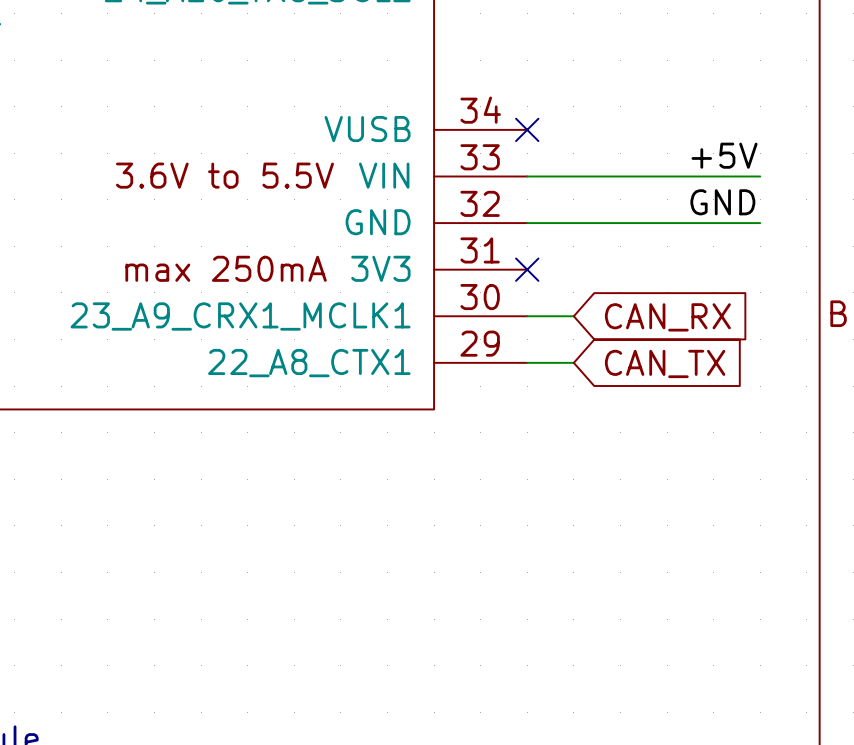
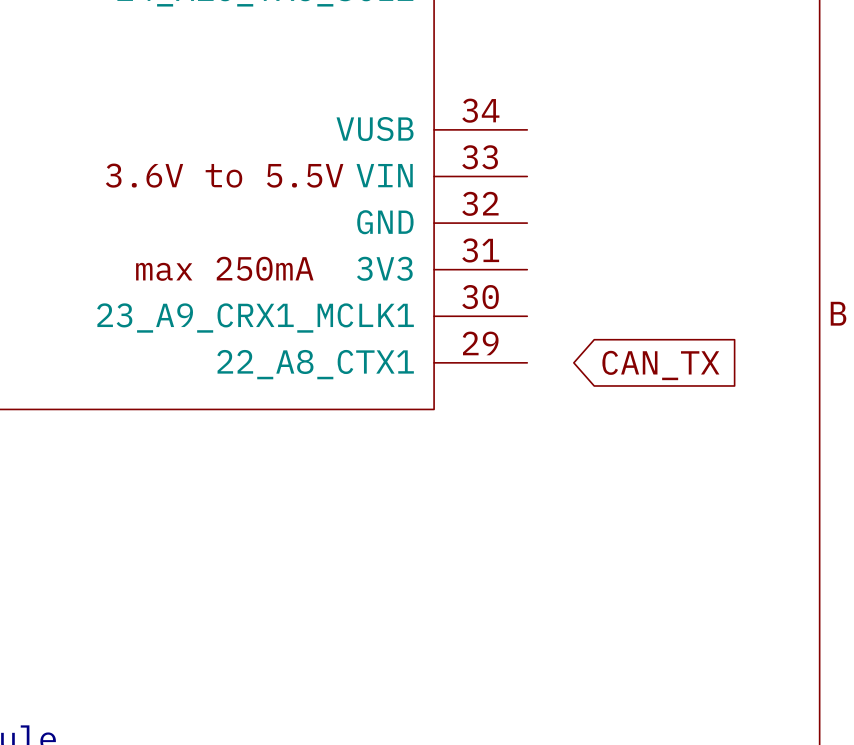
no-connect mark: (527, 129) -> none
label: +5V (724, 155) -> none
wire: (527, 176) (760, 176) -> none
label: GND (722, 202) -> none
wire: (527, 223) (760, 223) -> none
no-connect mark: (527, 269) -> none
wire: (527, 316) (573, 316) -> none
global label: CAN_RX (667, 317) -> none
wire: (527, 362) (573, 362) -> none

